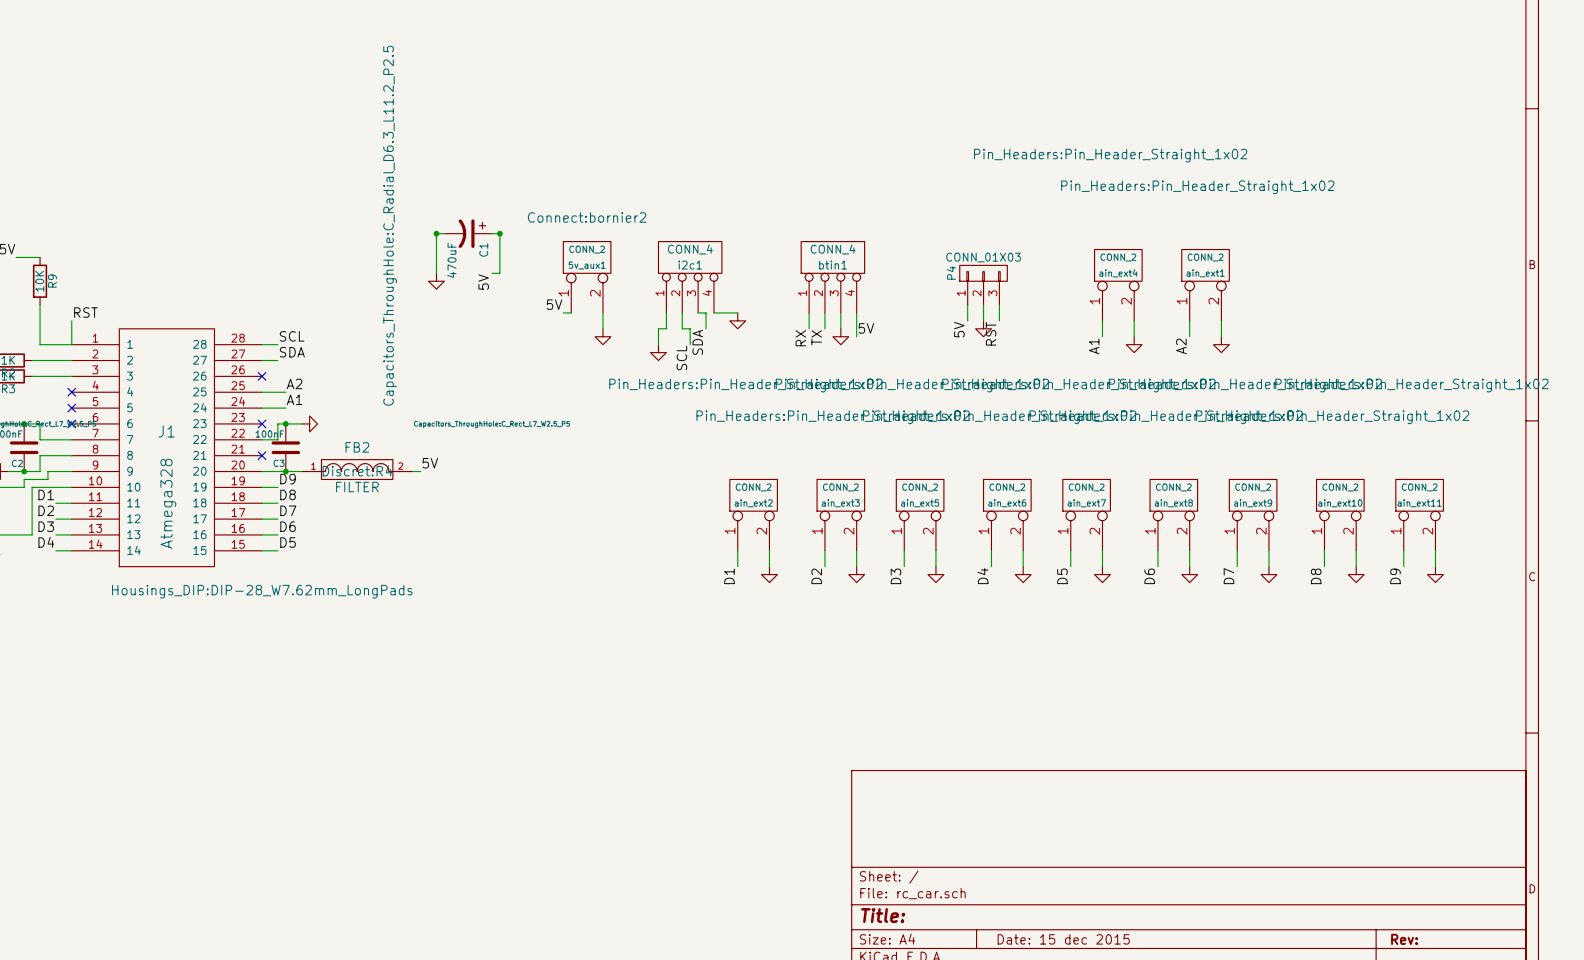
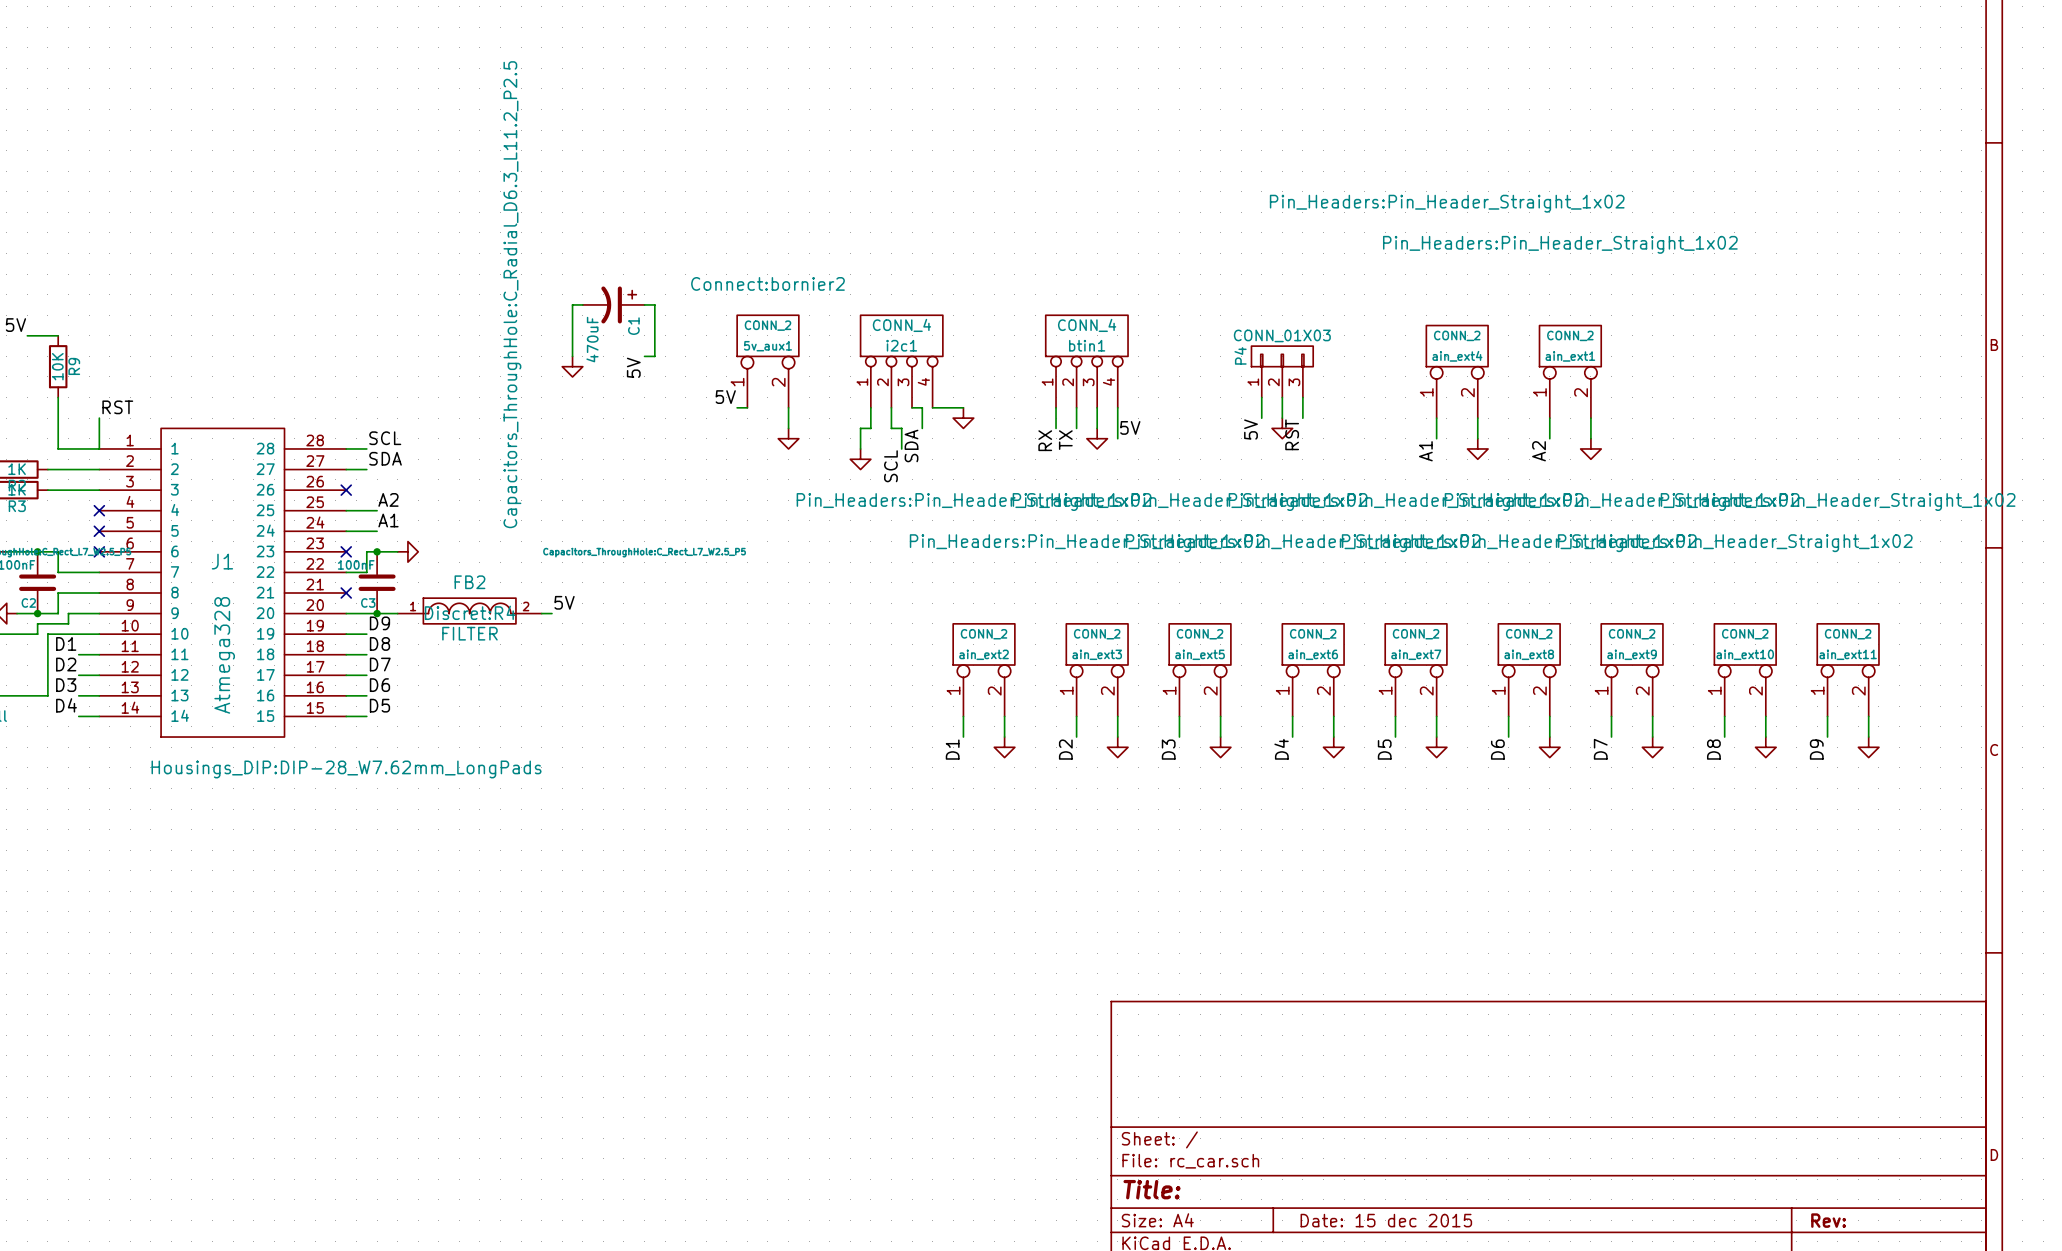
junction: (436, 233) -> none
junction: (499, 233) -> none

